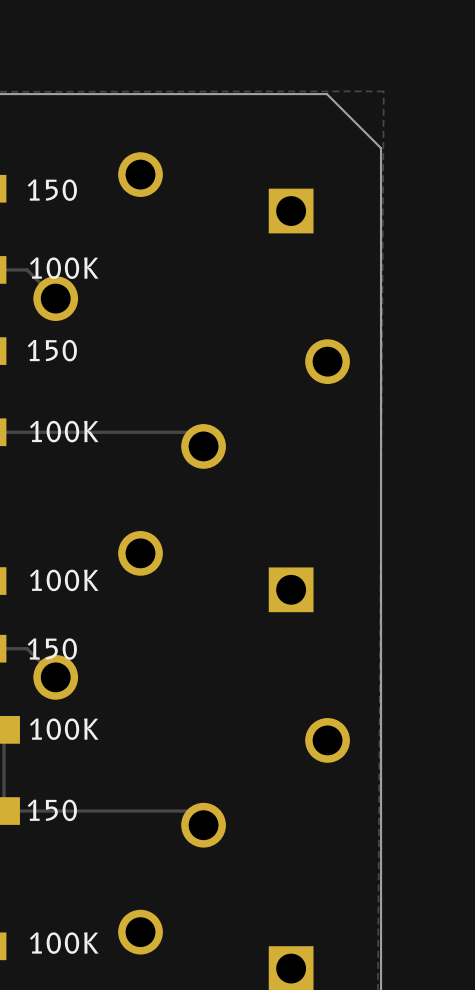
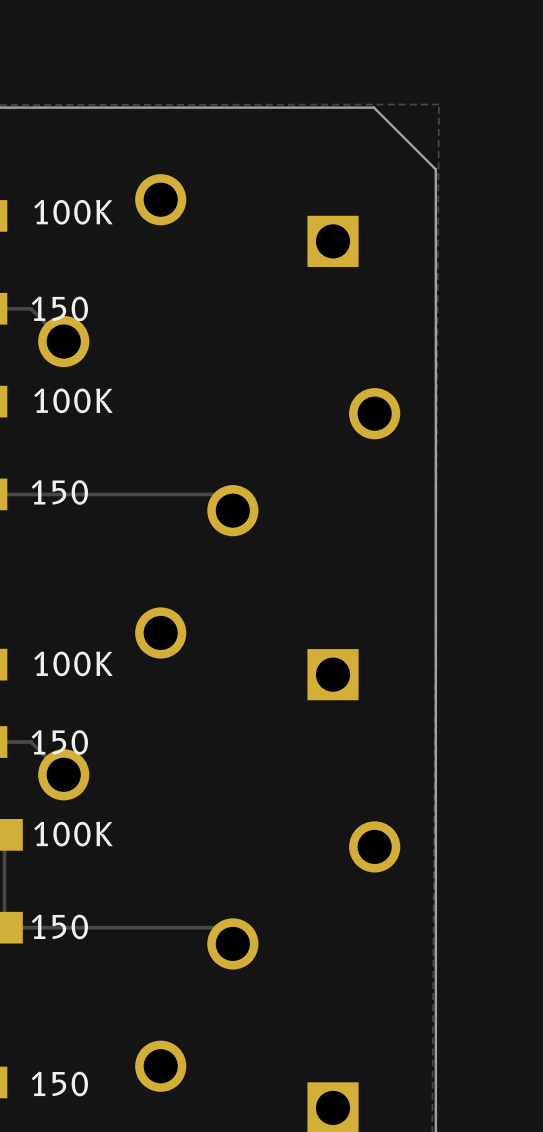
part value: 150 (52, 190) -> 100K (73, 212)
part value: 100K (64, 268) -> 150 (59, 308)
part value: 150 (52, 350) -> 100K (73, 400)
part value: 100K (64, 431) -> 150 (59, 492)
part value: 100K (64, 943) -> 150 (59, 1084)

